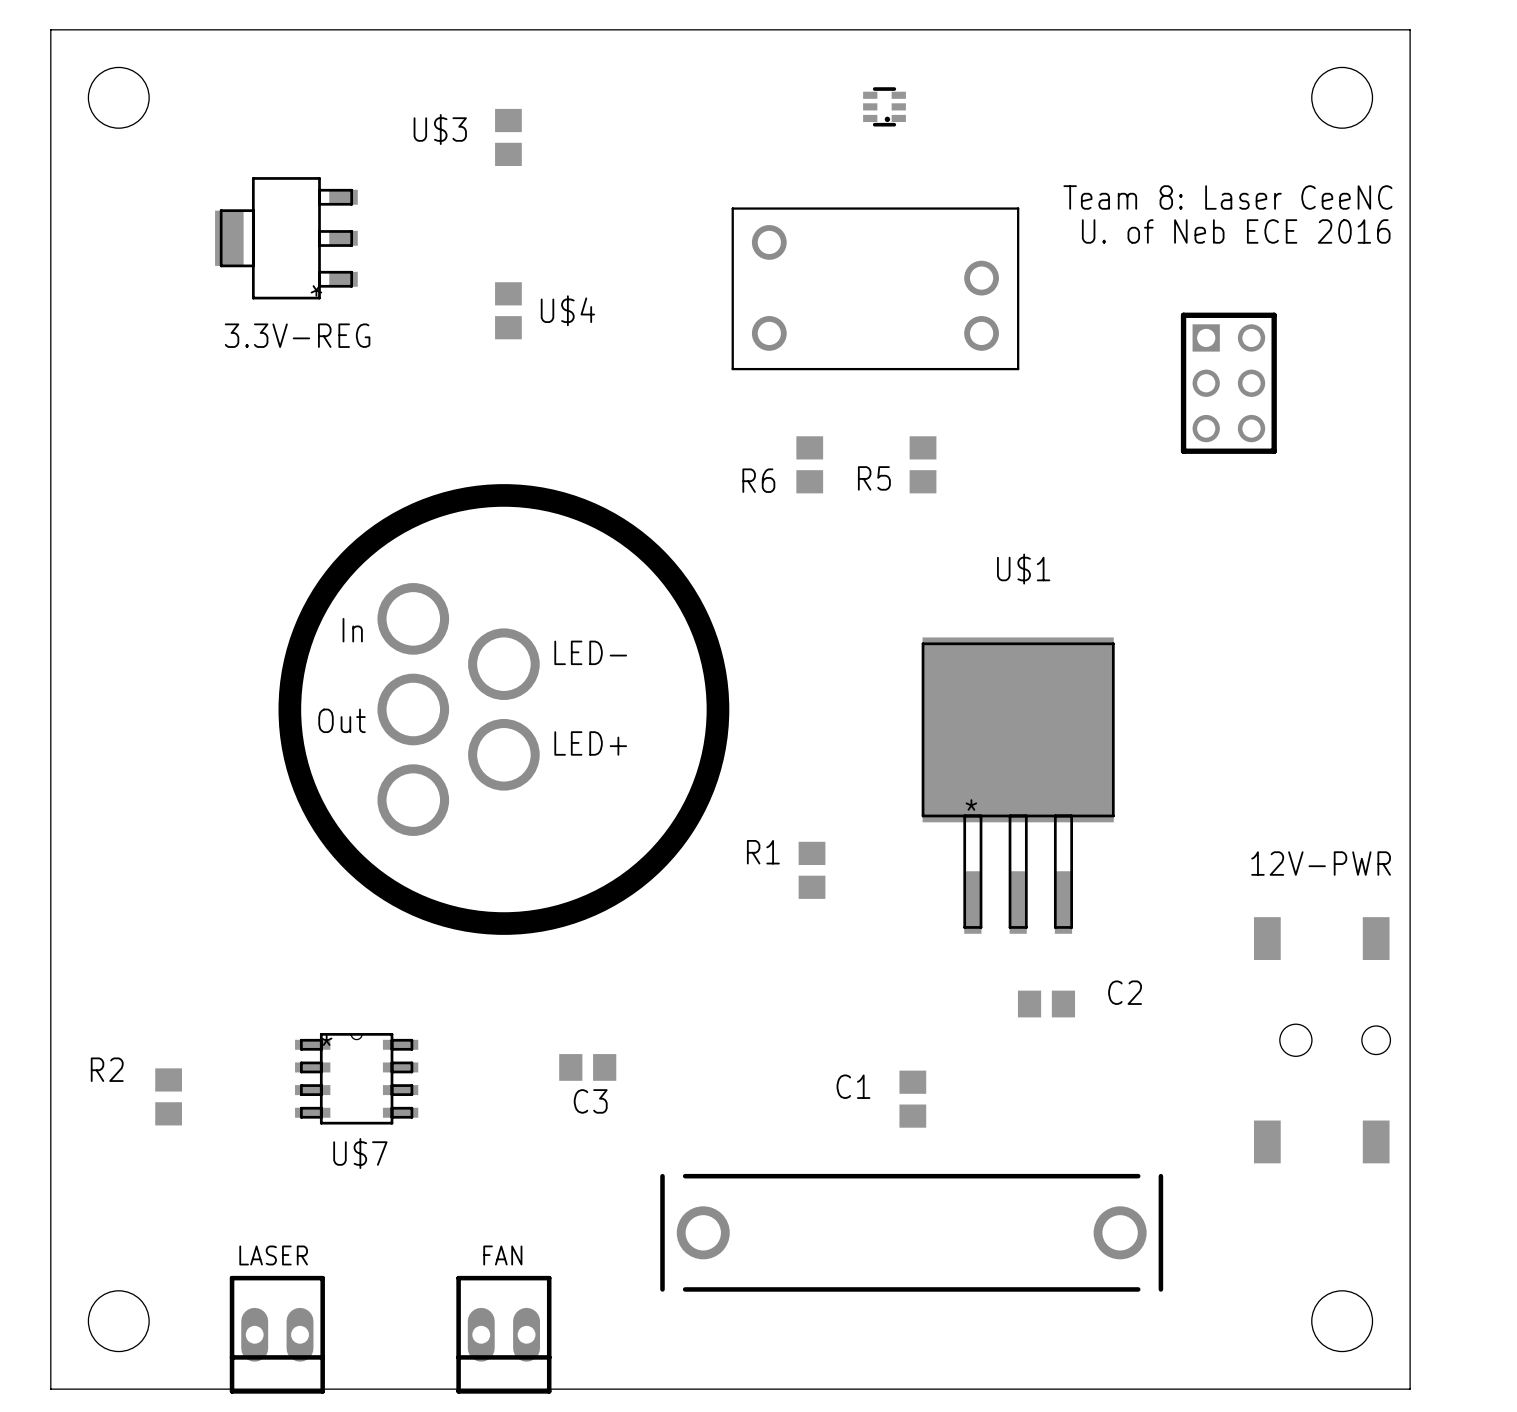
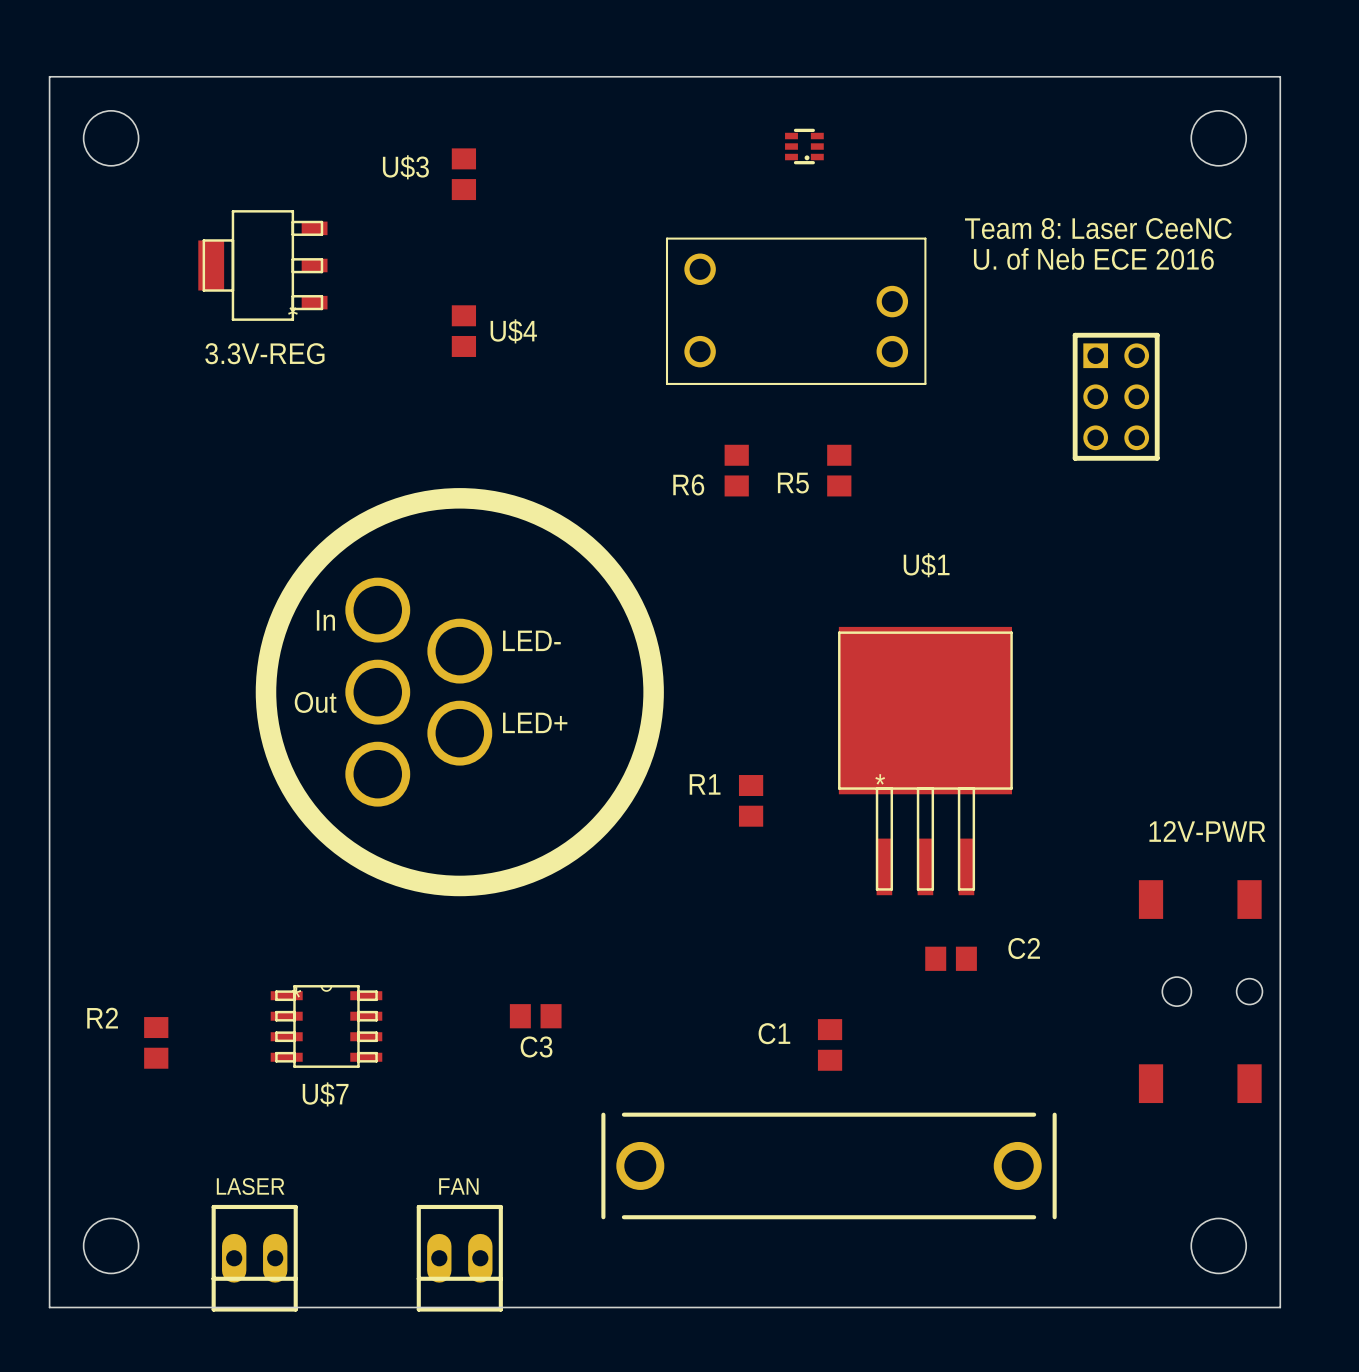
R1 position: (812, 870) -> (751, 800)

